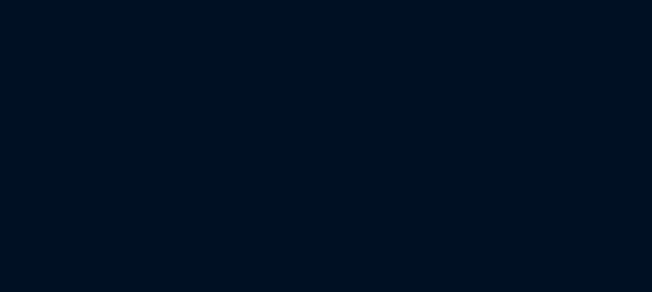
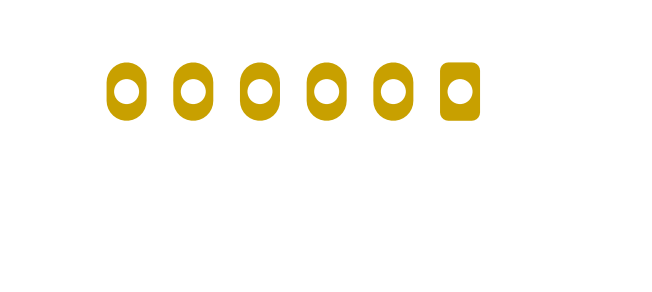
part: none -> (293, 91)

